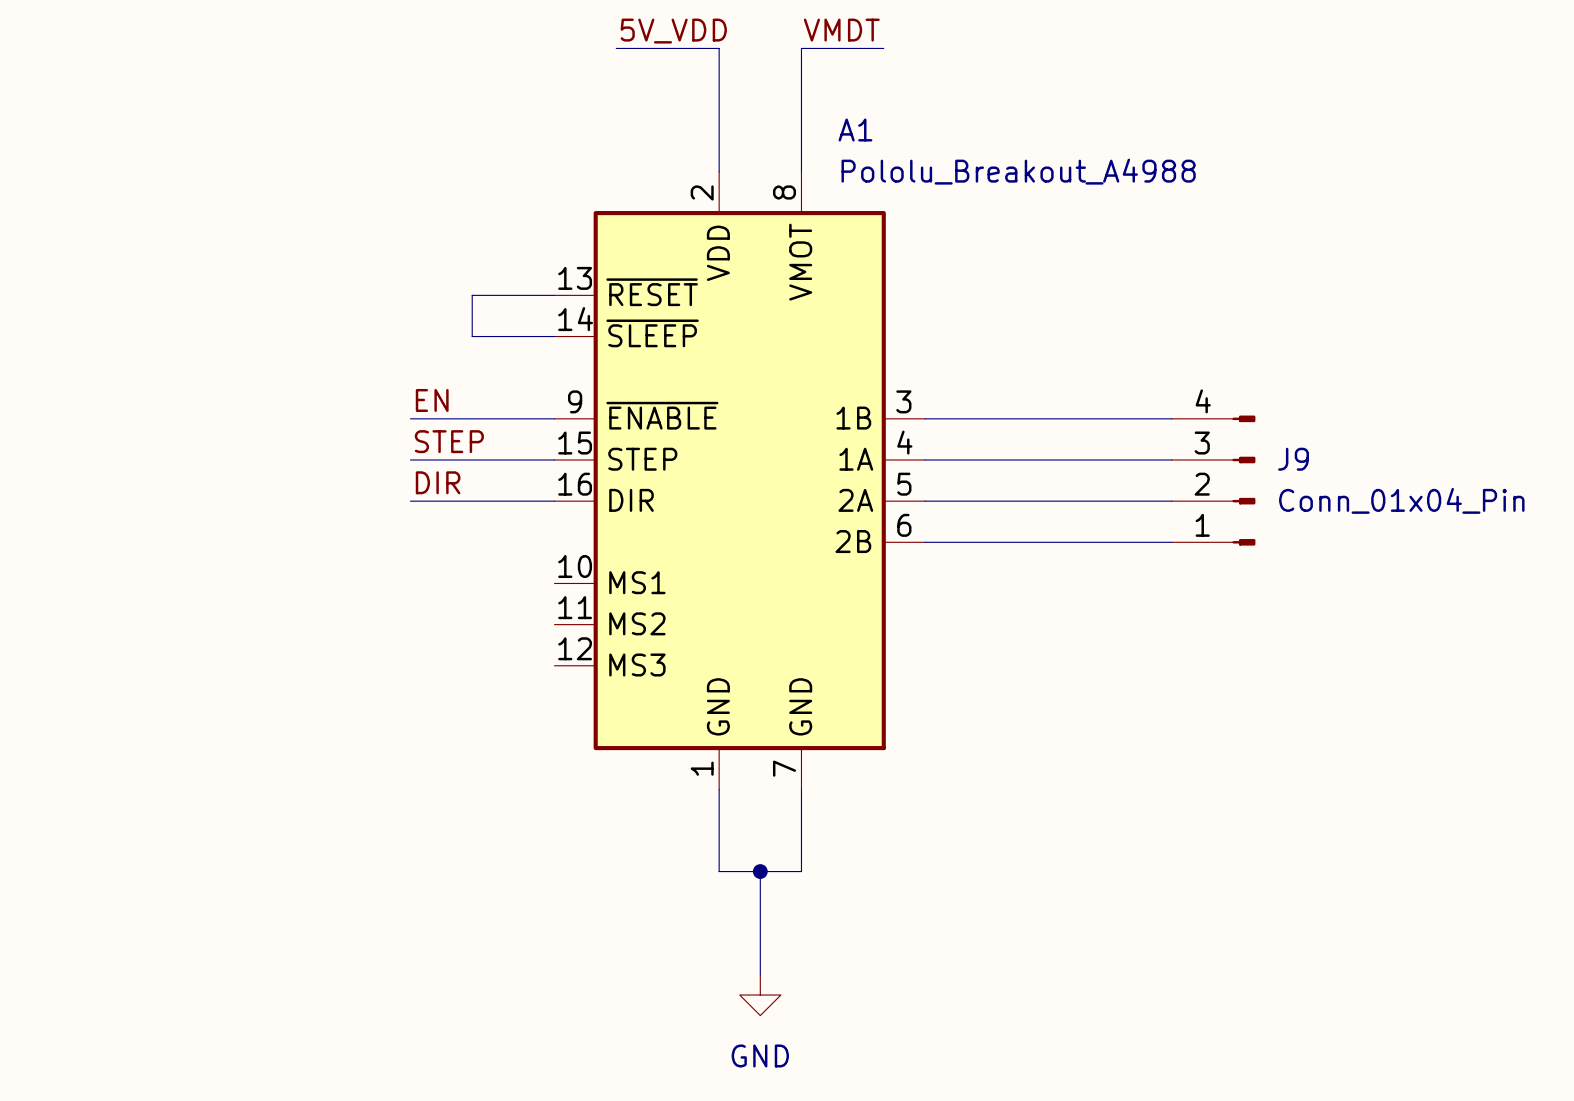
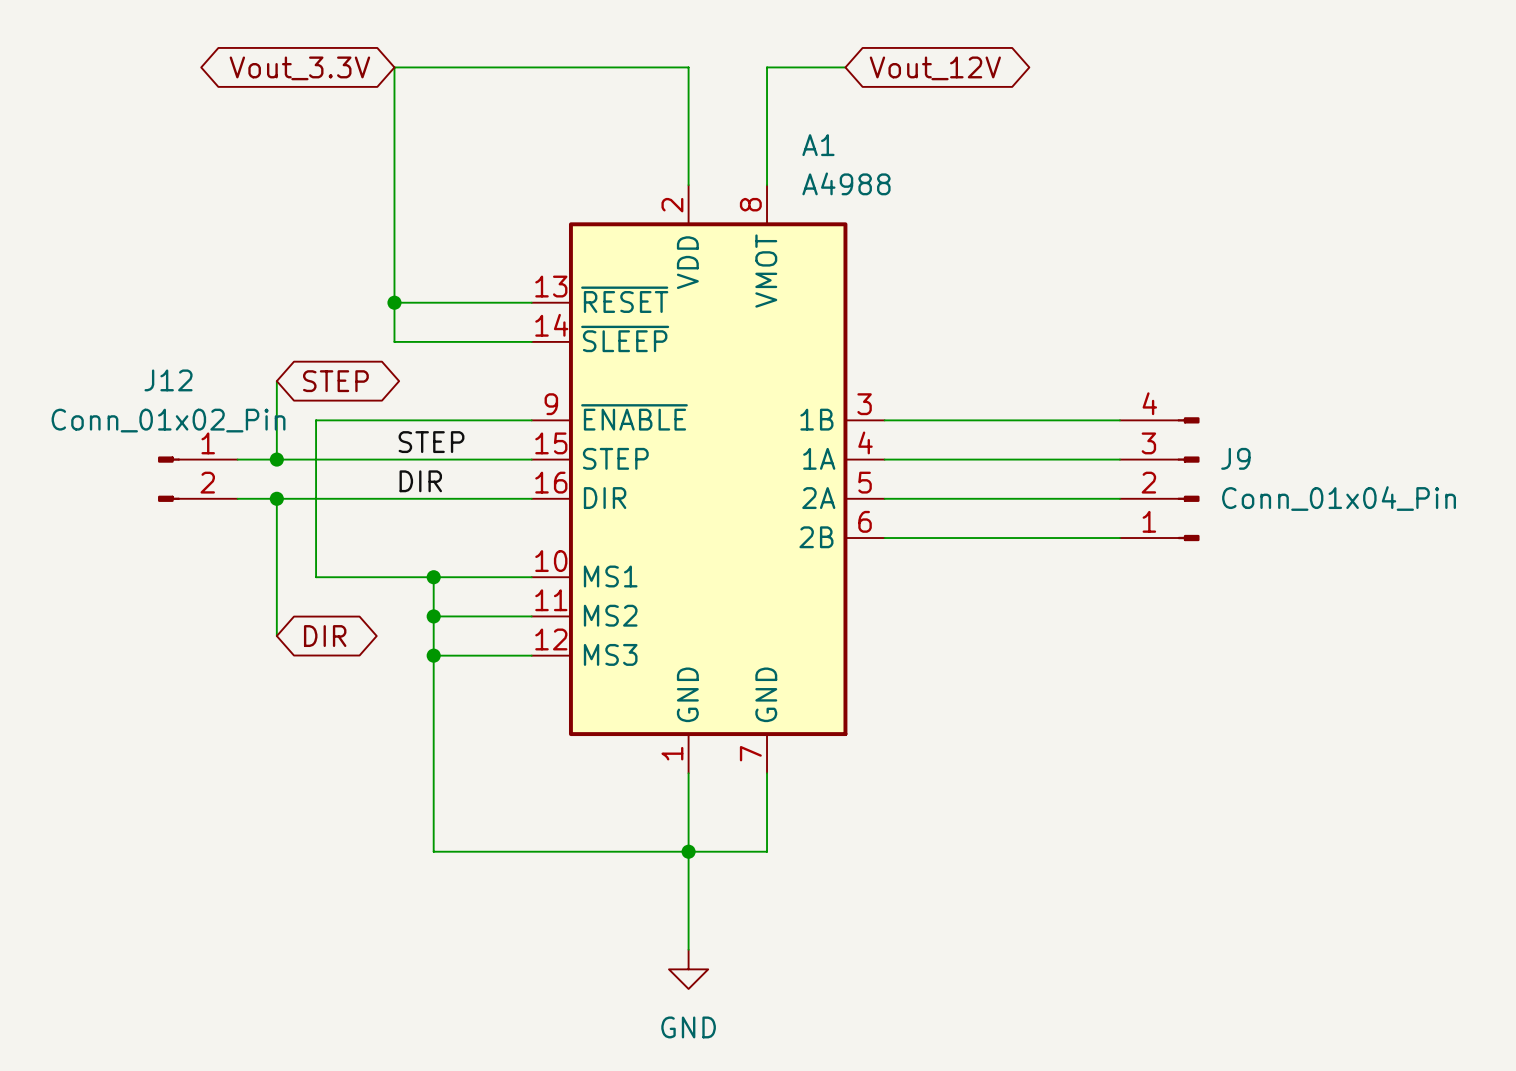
label: VMDT (841, 30) -> none
label: 5V_VDD (673, 31) -> none
wire: none -> (590, 67) (394, 67) (394, 341) (453, 341)
global label: none -> Vout_3.3V (299, 68)
global label: none -> Vout_12V (935, 68)
A1 value: Pololu_Breakout_A4988 (1018, 171) -> A4988 (846, 183)
junction: none -> (394, 302)
wire: (472, 295) (472, 336) -> (453, 302) (394, 302)
wire: none -> (276, 381) (276, 459)
global label: none -> STEP (335, 381)
label: EN (432, 400) -> none
wire: none -> (394, 420) (316, 420) (316, 577) (531, 577)
wire: none -> (237, 459) (394, 459)
junction: none -> (276, 459)
J12: none -> Conn_01x02_Pin (197, 479)
wire: none -> (237, 498) (394, 498)
wire: none -> (276, 498) (276, 636)
junction: none -> (276, 498)
wire: none -> (433, 577) (433, 851) (688, 851) (688, 949)
junction: none -> (433, 577)
wire: none -> (433, 616) (531, 616)
junction: none -> (433, 616)
global label: none -> DIR (325, 636)
wire: none -> (433, 655) (531, 655)
junction: none -> (433, 655)
wire: (760, 871) (760, 974) -> none
junction position: (760, 871) -> (688, 851)
power symbol position: GND (760, 995) -> GND (688, 969)

